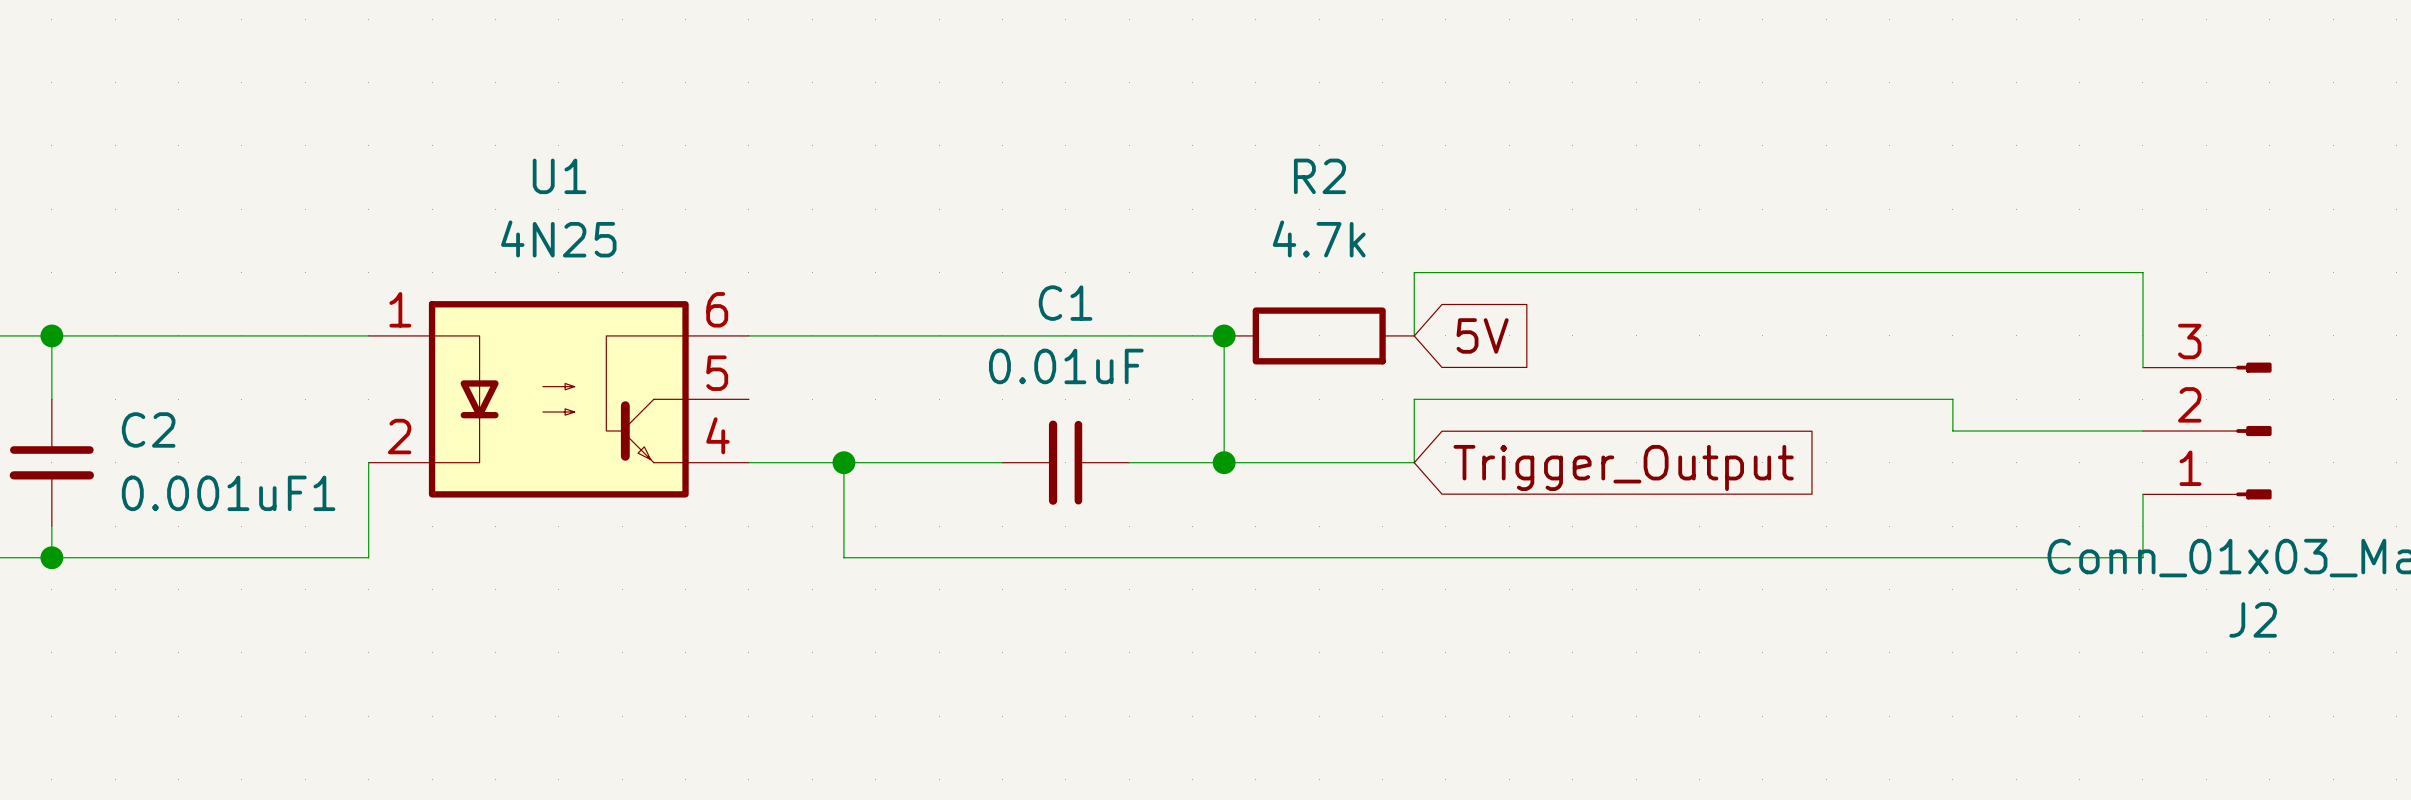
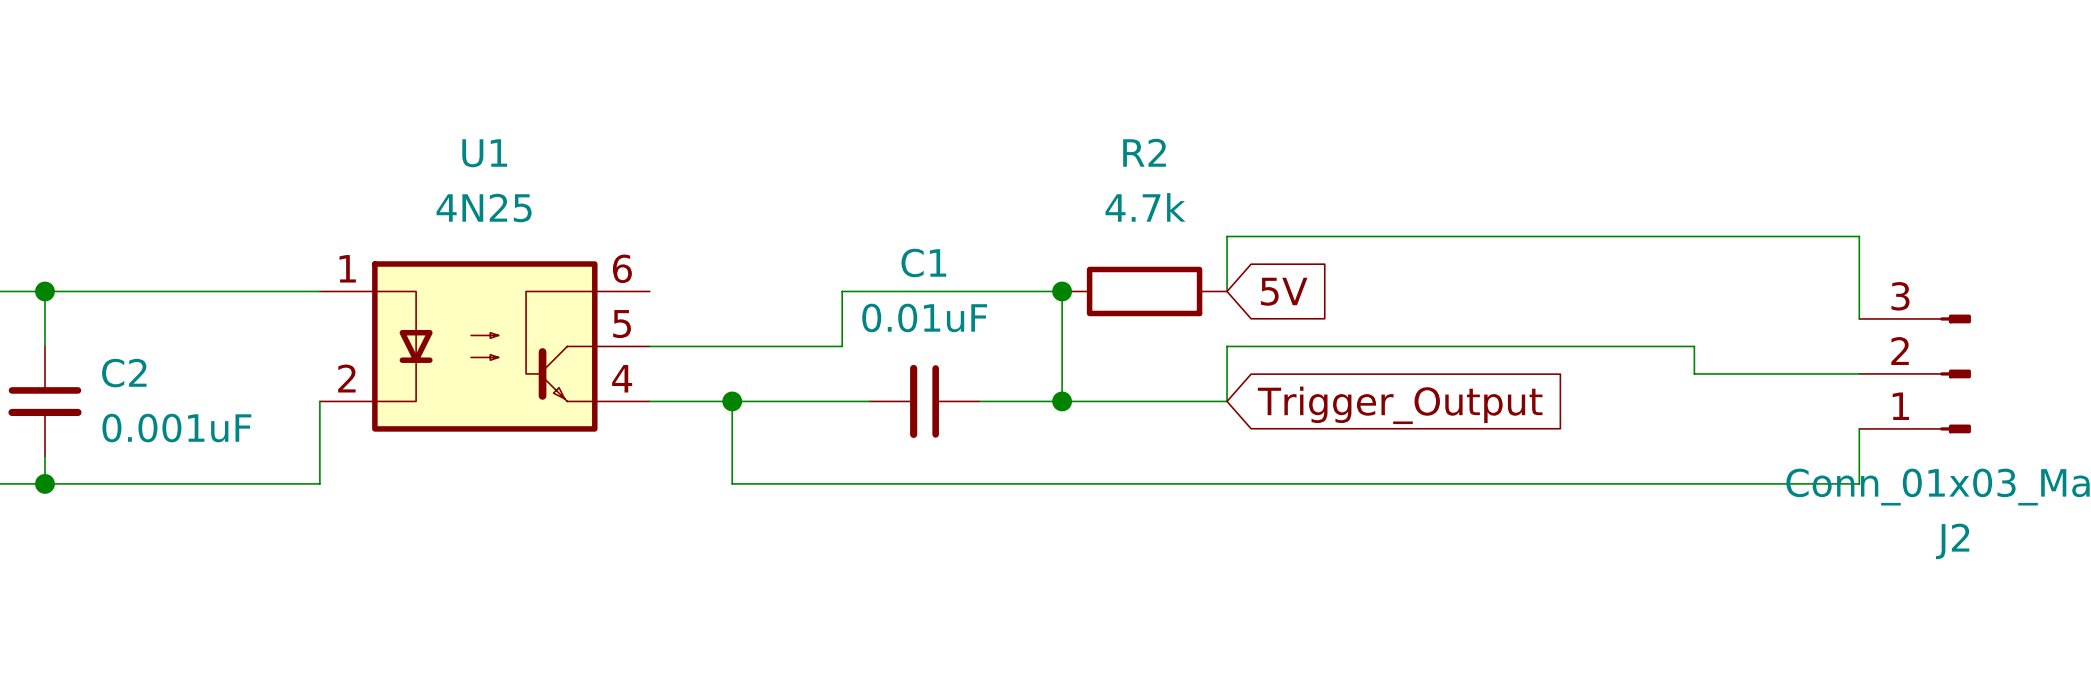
wire: (748, 335) (970, 335) -> (649, 346) (842, 346) (842, 291)
C2 value: 0.001uF1 (228, 493) -> 0.001uF (176, 428)

